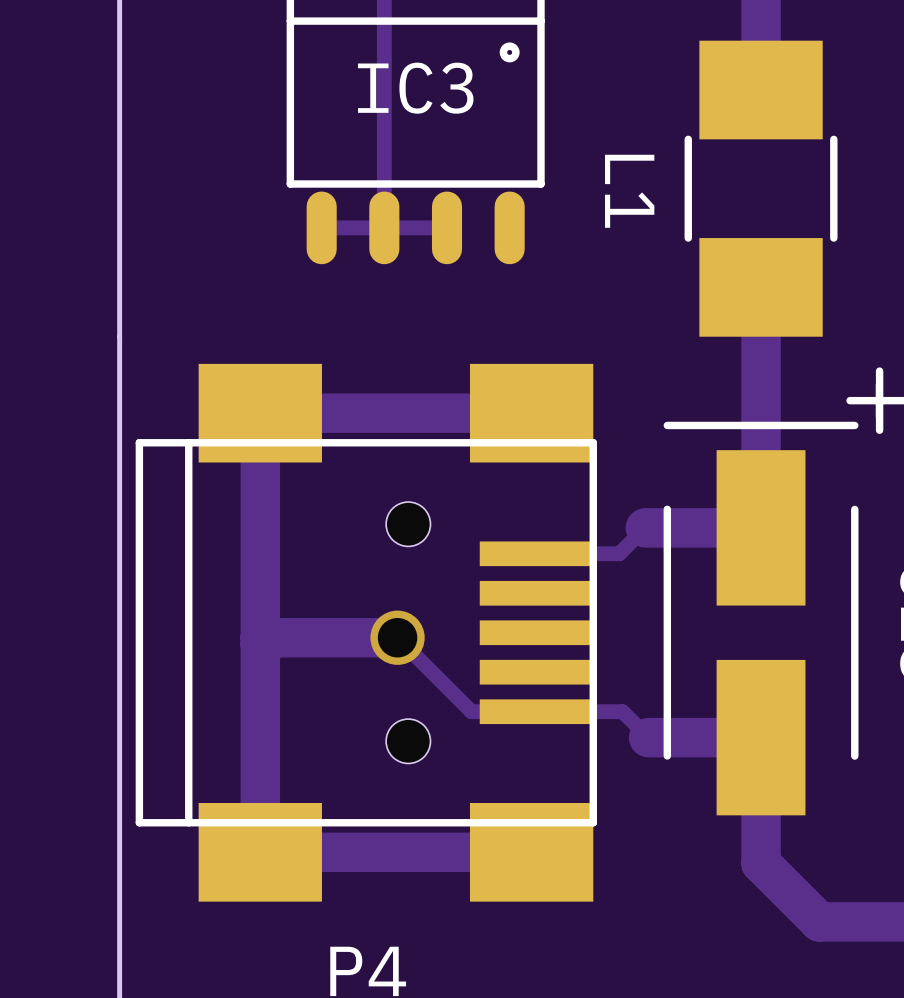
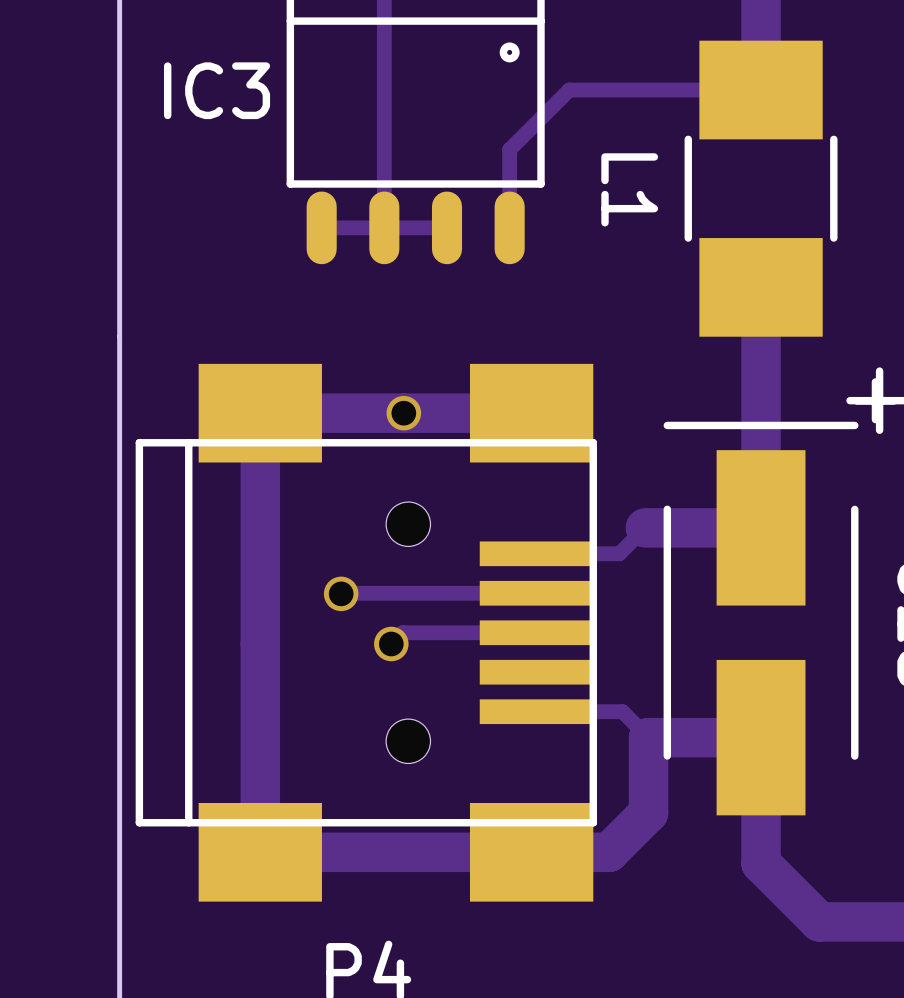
IC3 name position: IC3 (415, 88) -> IC3 (217, 90)
track: none -> (761, 90) (569, 90) (509, 149) (509, 227)
via: none -> (403, 413)
via: none -> (341, 593)
track: none -> (536, 593) (341, 593)
via size: [370, 610, 425, 665] -> [374, 626, 409, 662]
track: none -> (536, 632) (402, 632) (391, 644)
track: (265, 643) (260, 637) (397, 637) (471, 711) (536, 711) -> none
track: none -> (648, 737) (648, 812) (609, 852) (531, 852)

